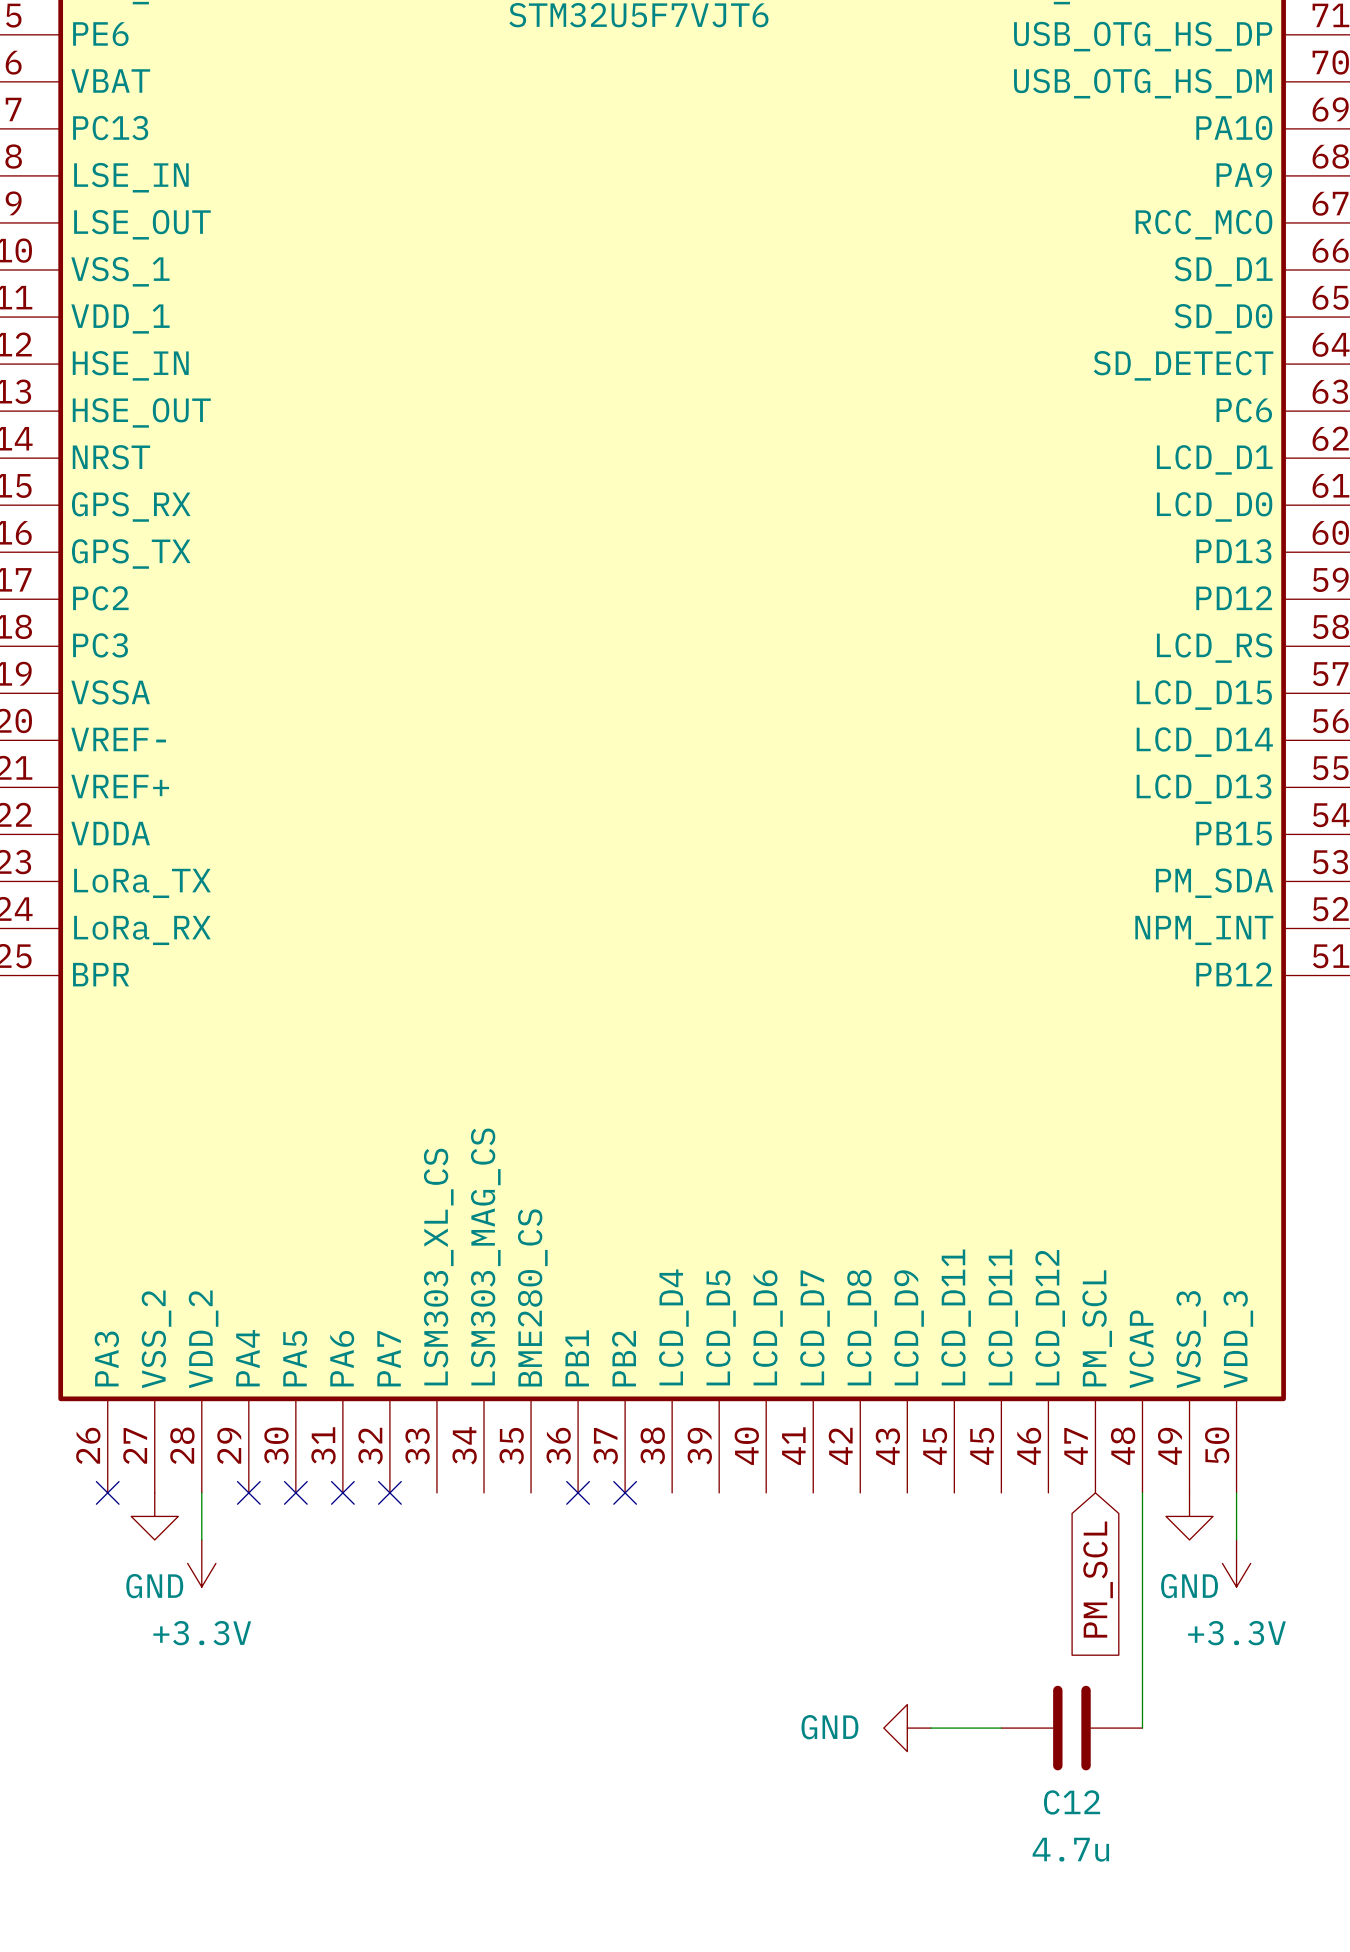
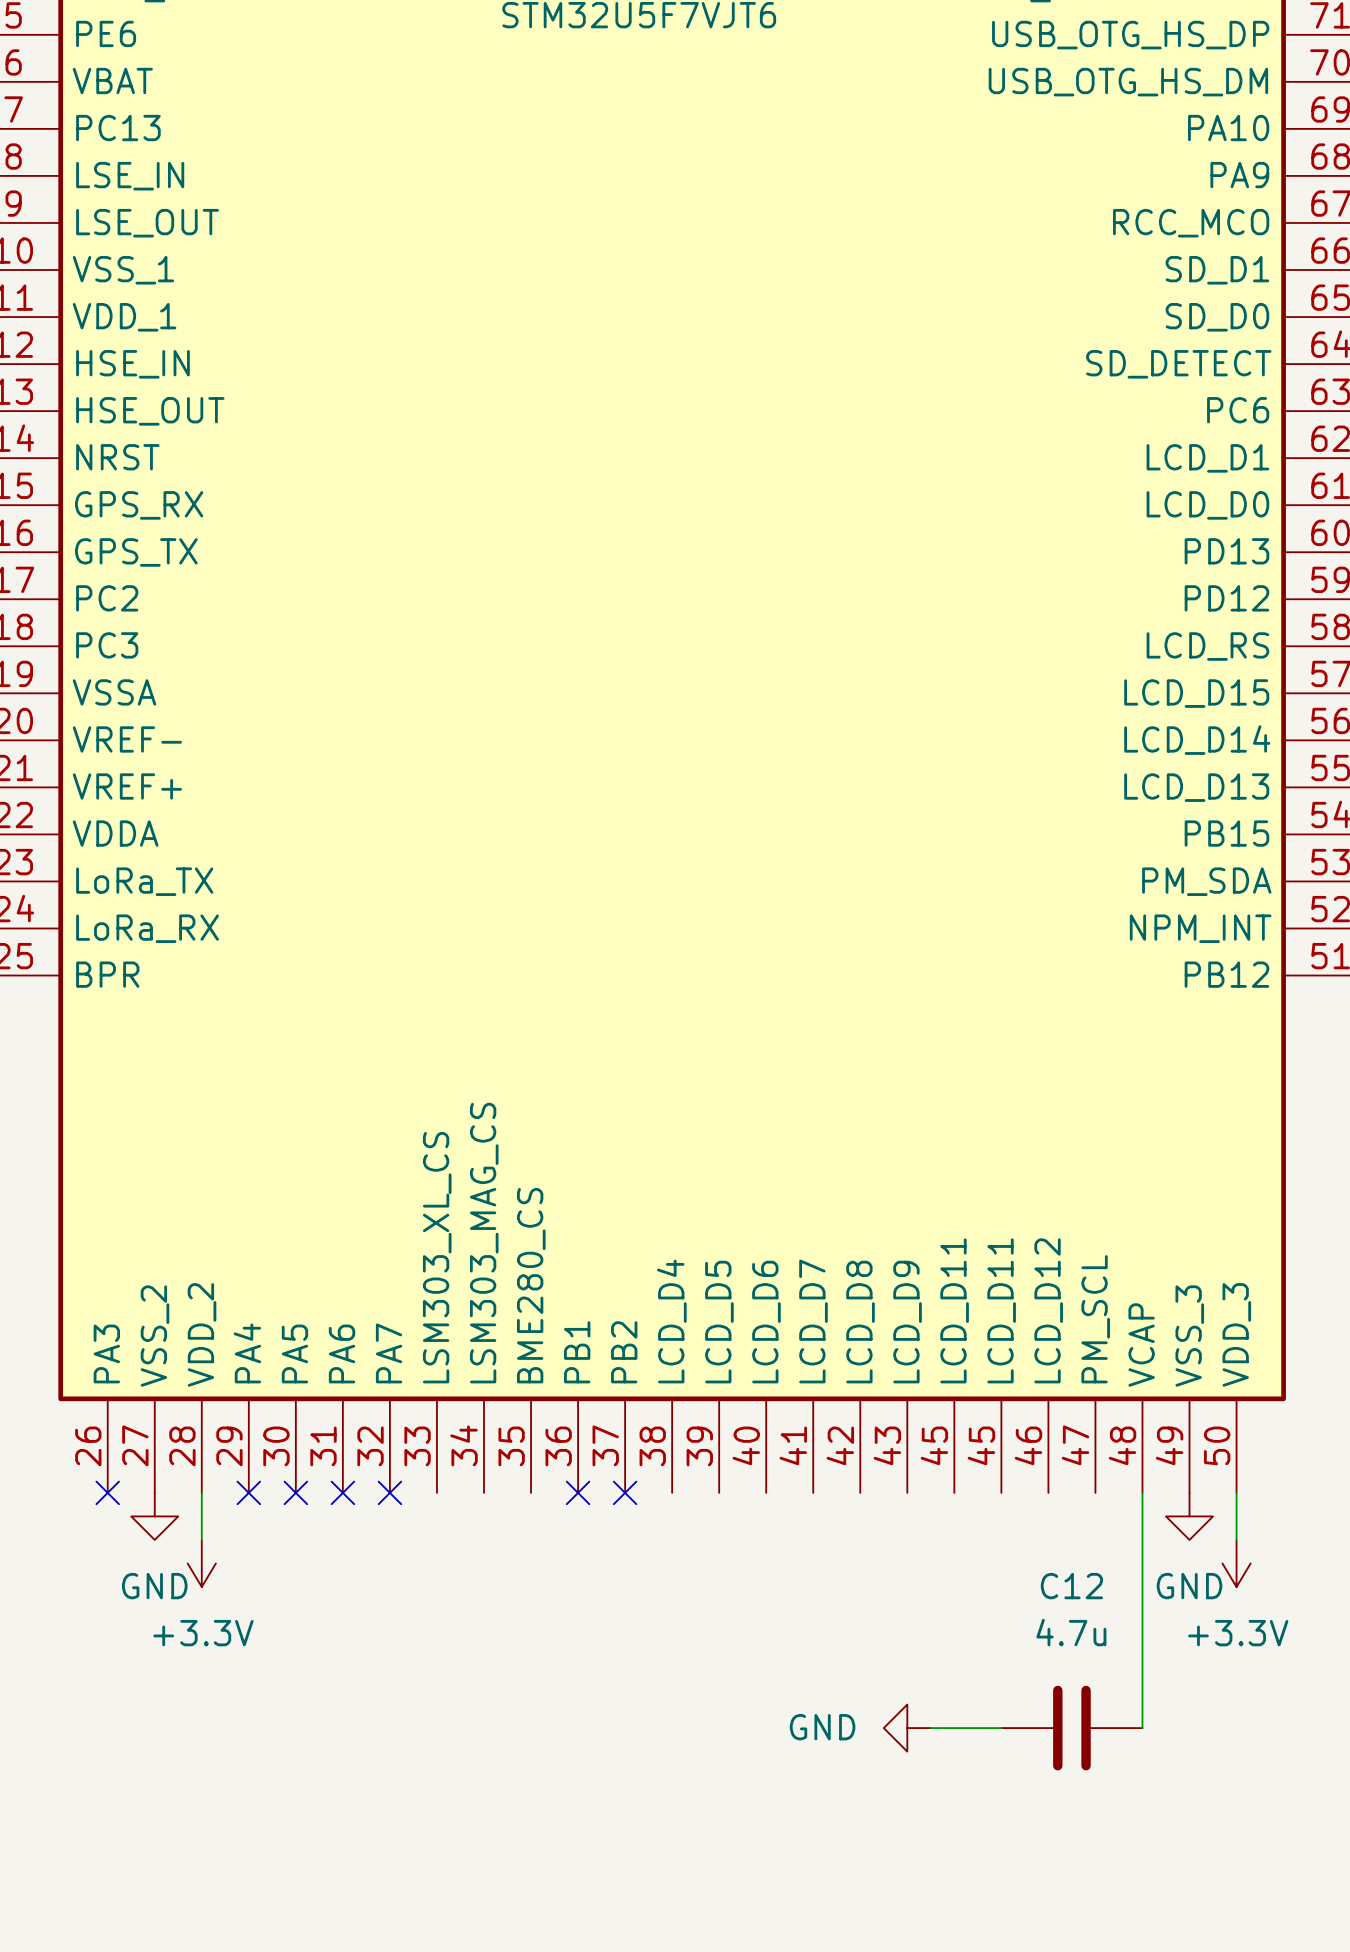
global label: PM_SCL (1098, 1579) -> none
C12 name position: C12 (1072, 1802) -> C12 (1071, 1586)
C12 value position: 4.7u (1070, 1849) -> 4.7u (1071, 1632)

